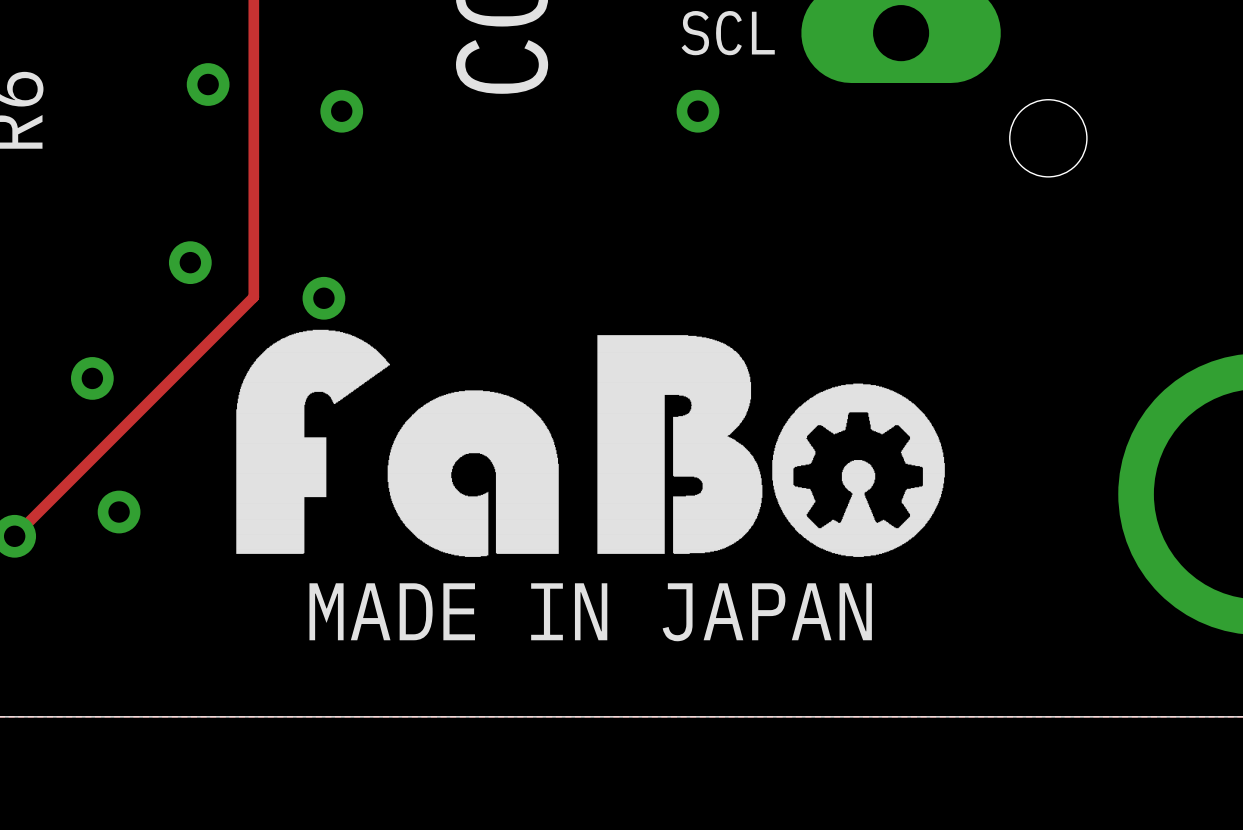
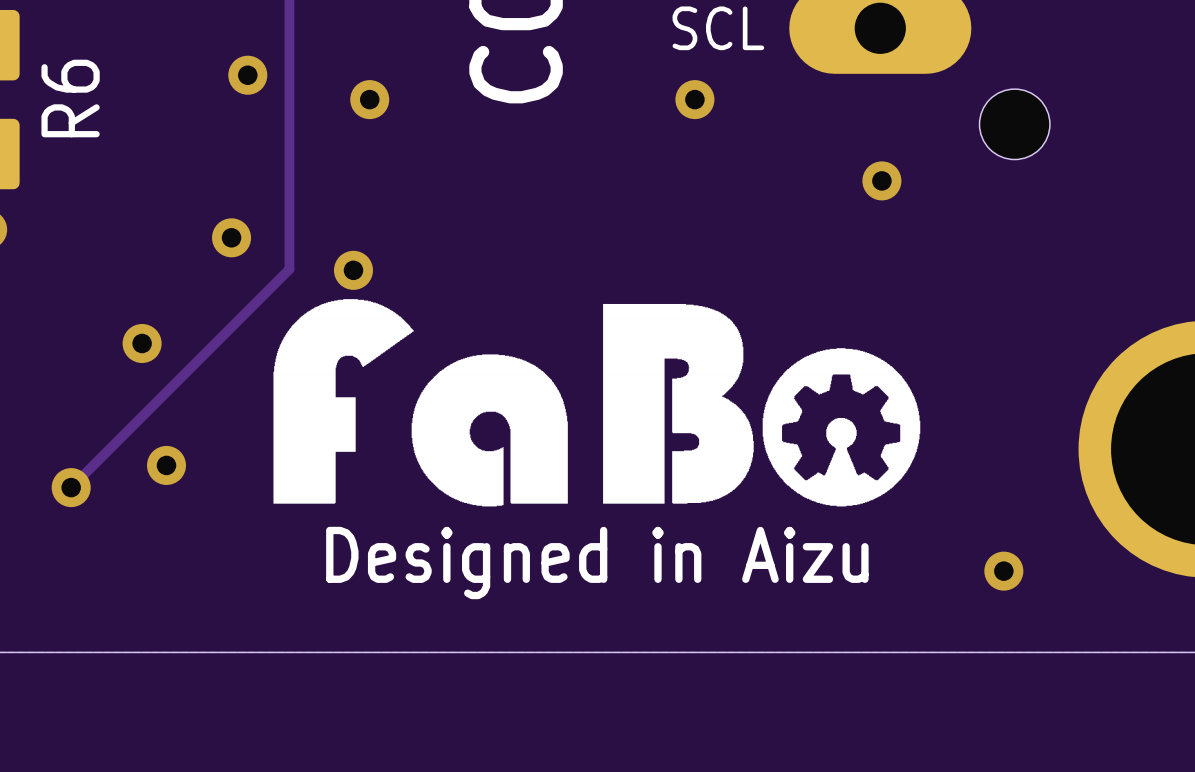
via: none -> (881, 180)
text: MADE IN JAPAN (590, 612) -> Designed in Aizu (597, 563)
via: none -> (1003, 571)

